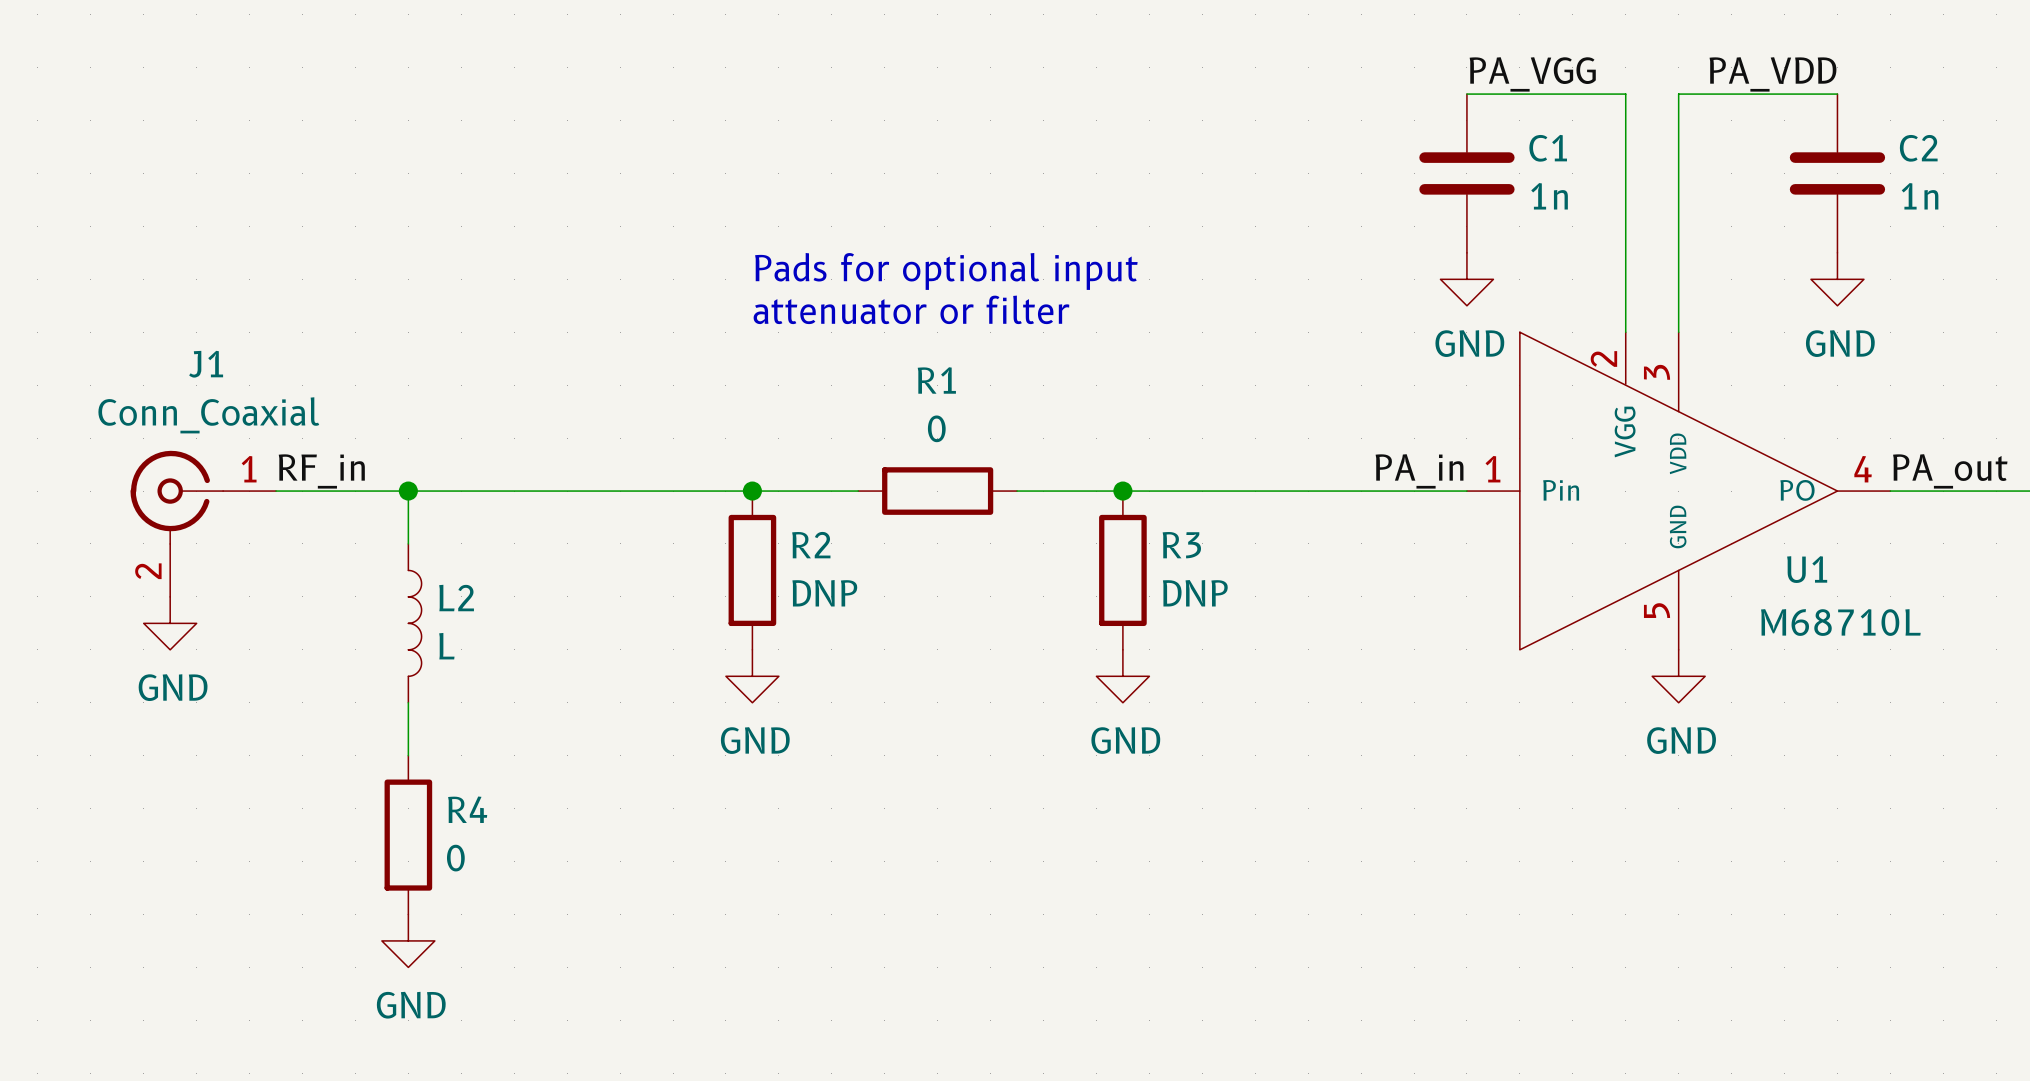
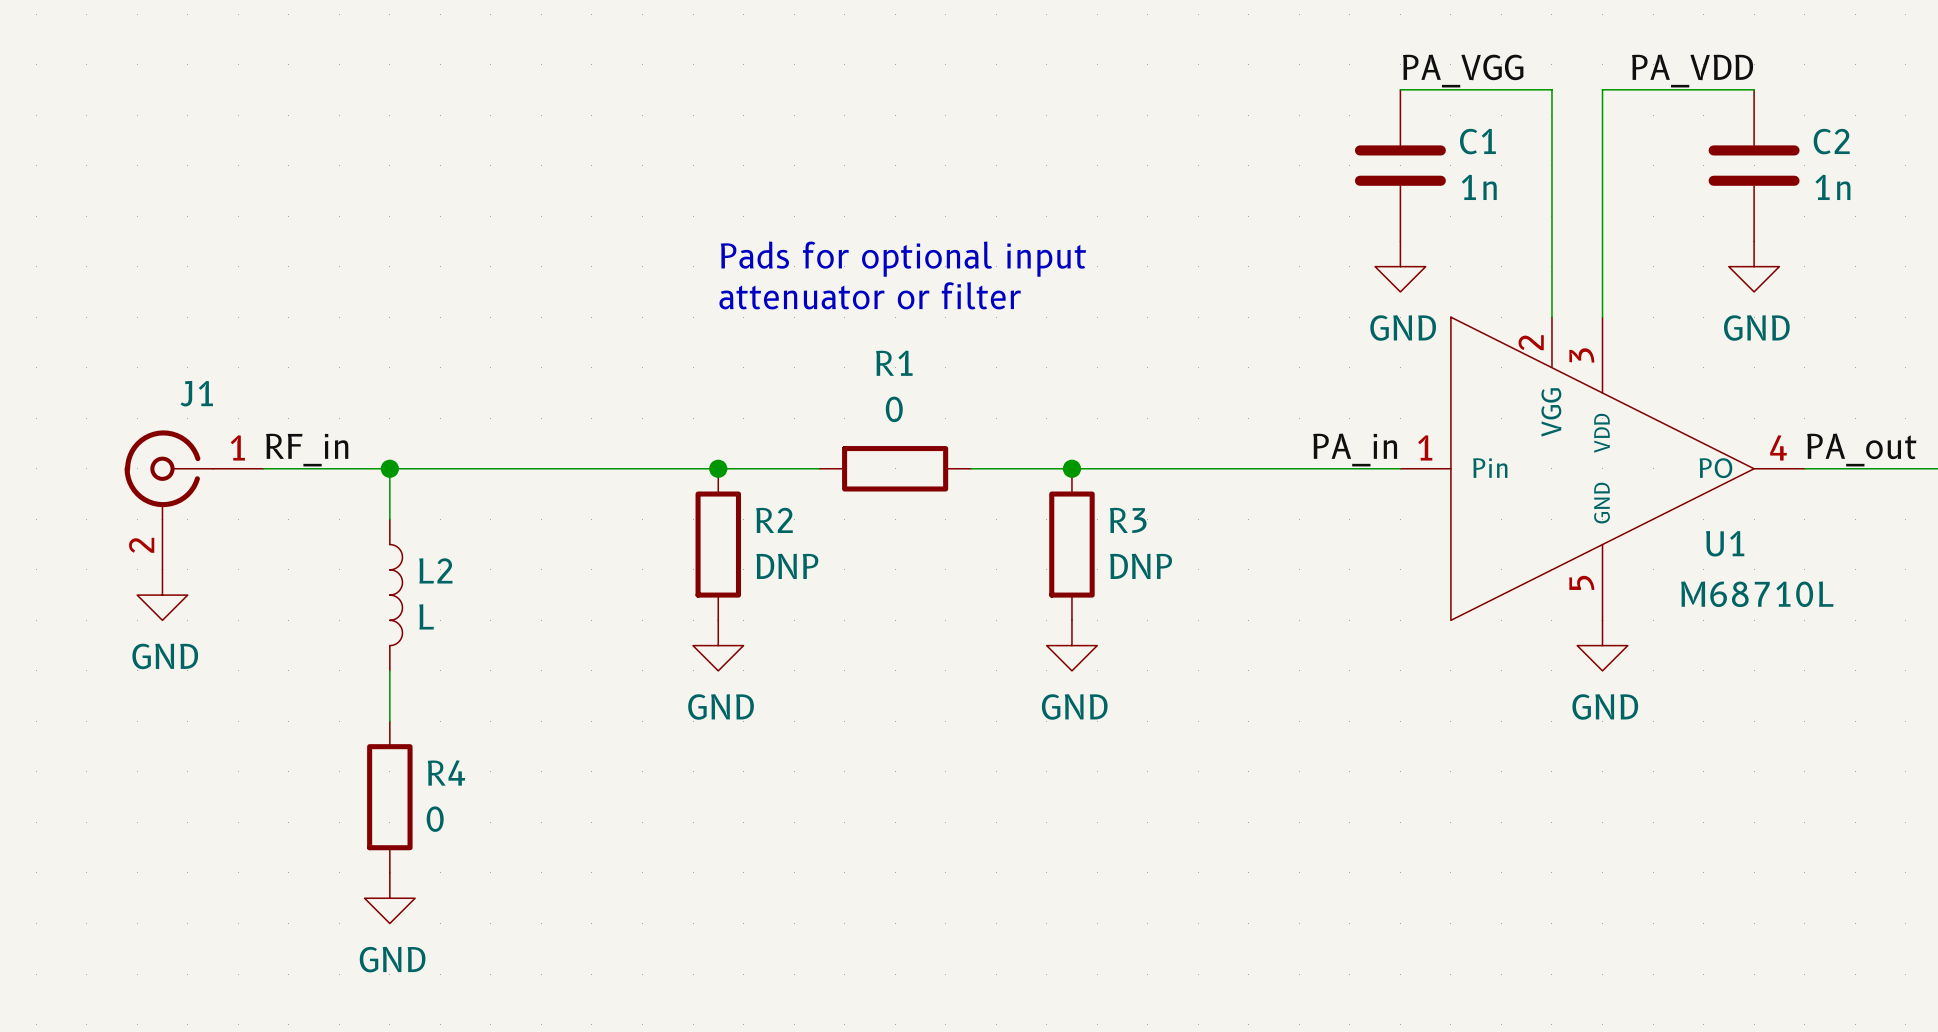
J1 name position: J1 (206, 364) -> J1 (196, 393)
J1 value: Conn_Coaxial (208, 415) -> none

